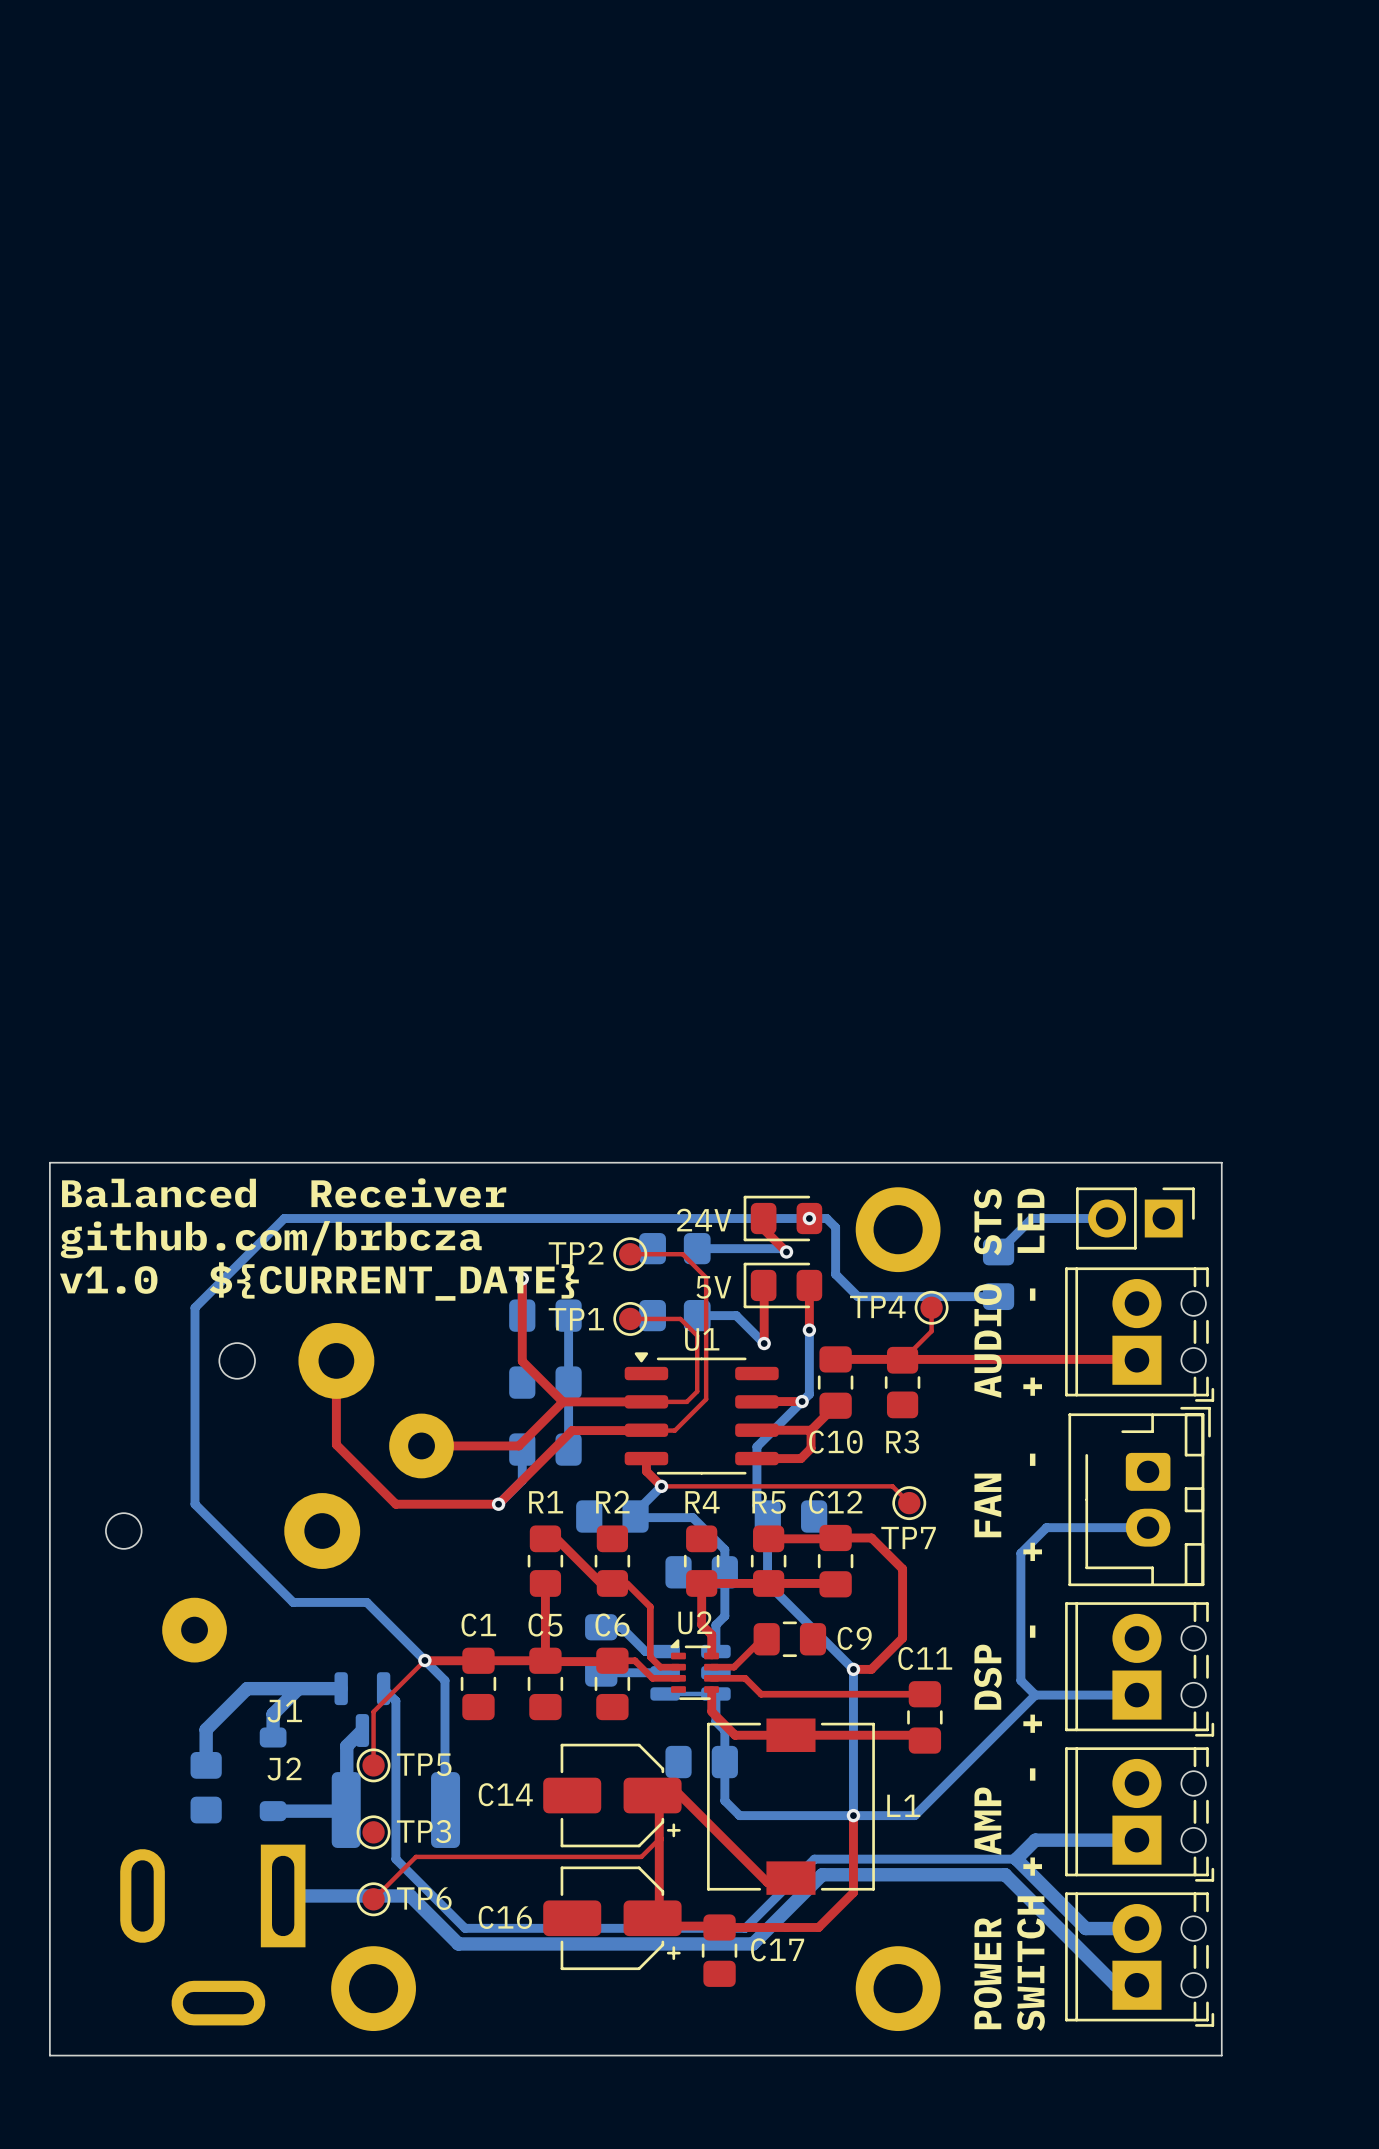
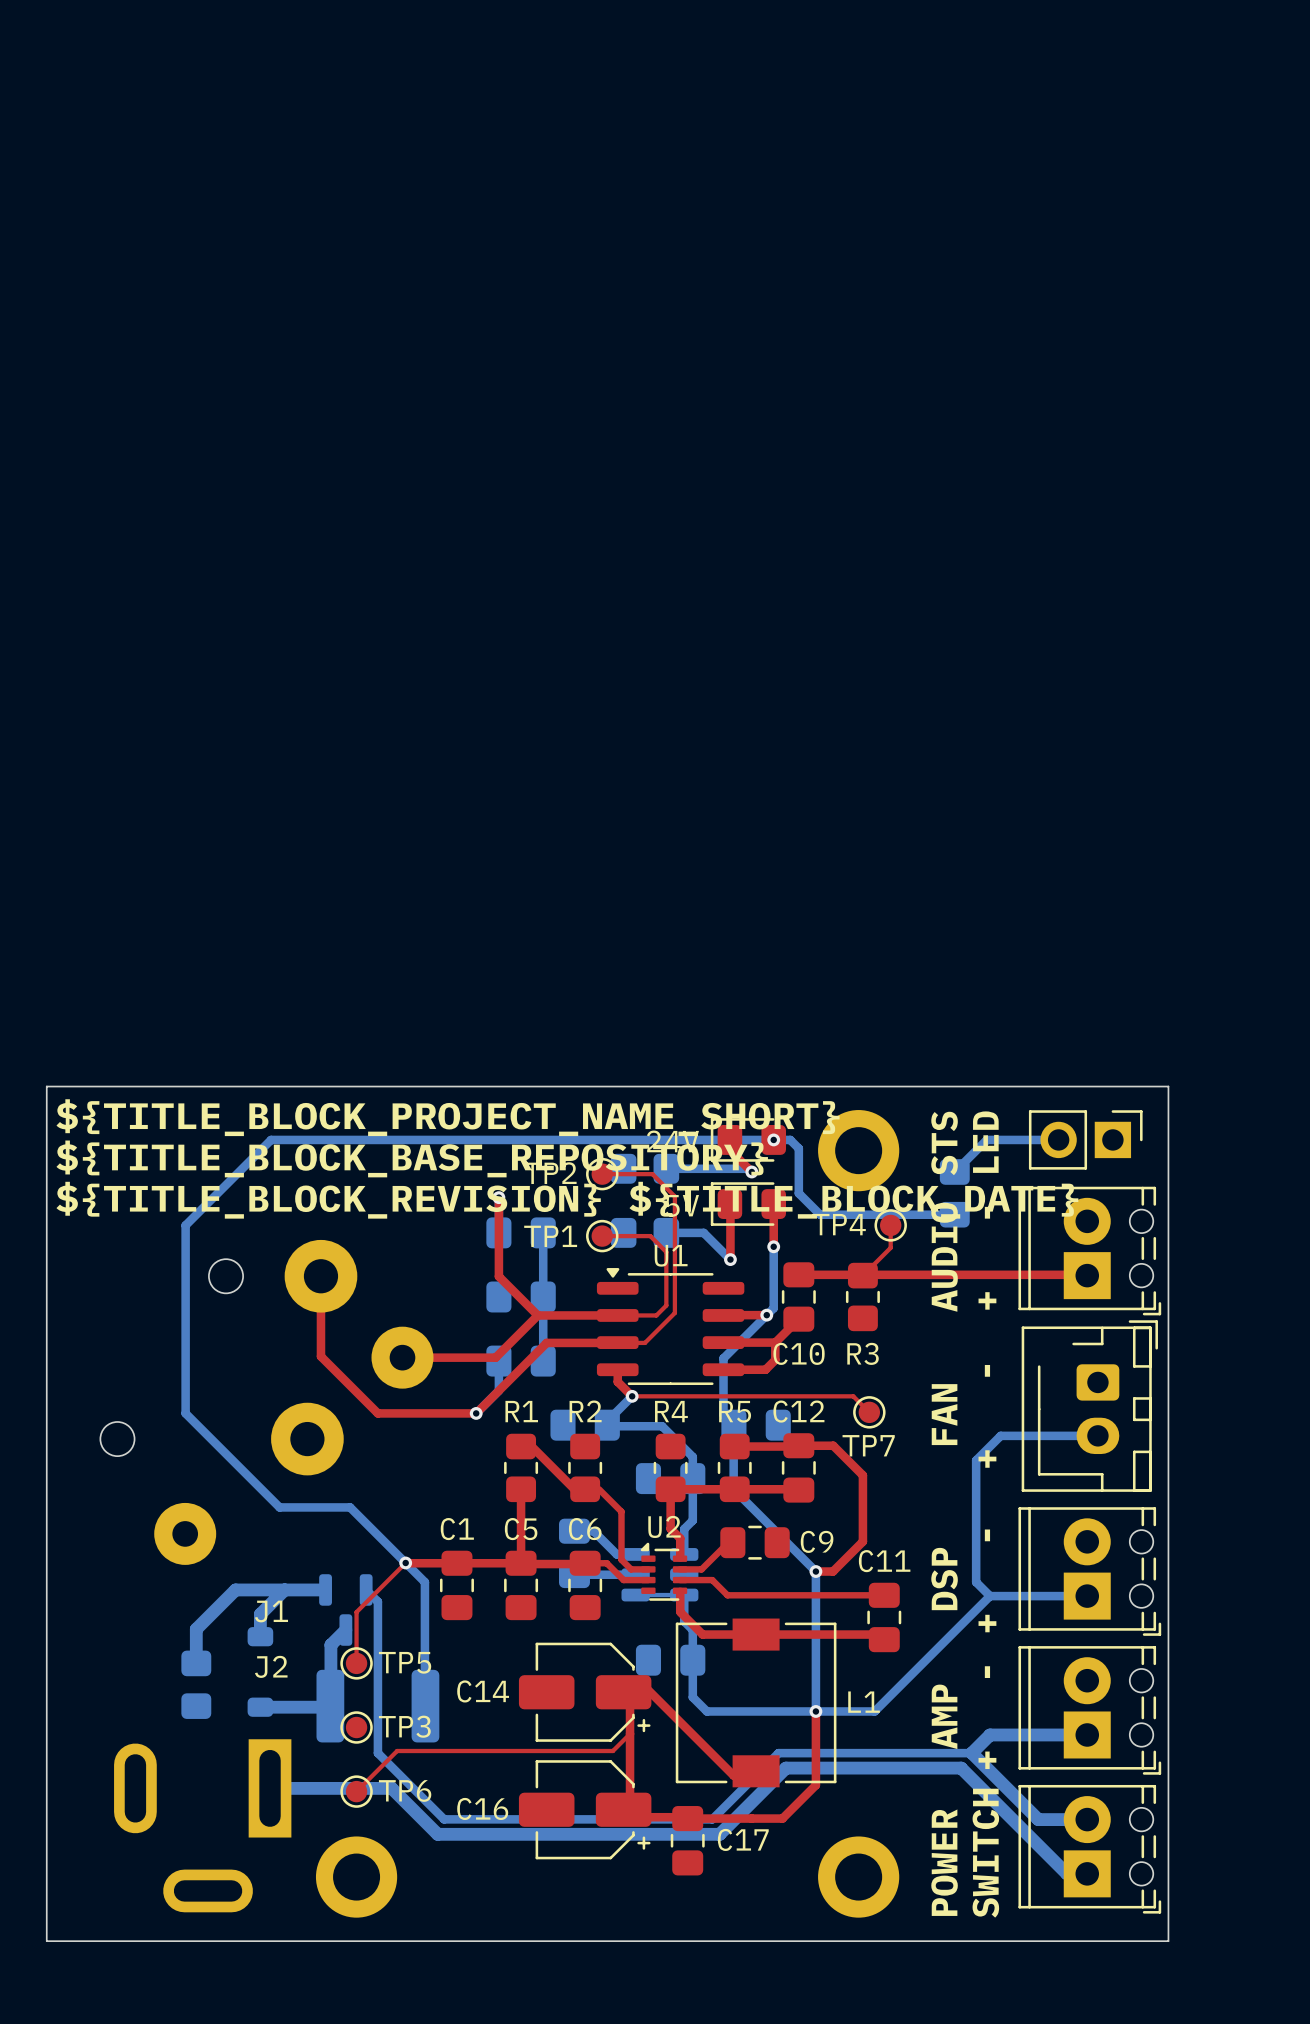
text: Balanced Receiver (284, 1192) -> ${TITLE_BLOCK_PROJECT_NAME_SHORT} (448, 1117)
text: github.com/brbcza (271, 1239) -> ${TITLE_BLOCK_BASE_REPOSITORY} (412, 1158)
text: v1.0 ${CURRENT_DATE} (319, 1281) -> ${TITLE_BLOCK_REVISION} ${TITLE_BLOCK_DATE} (567, 1200)

